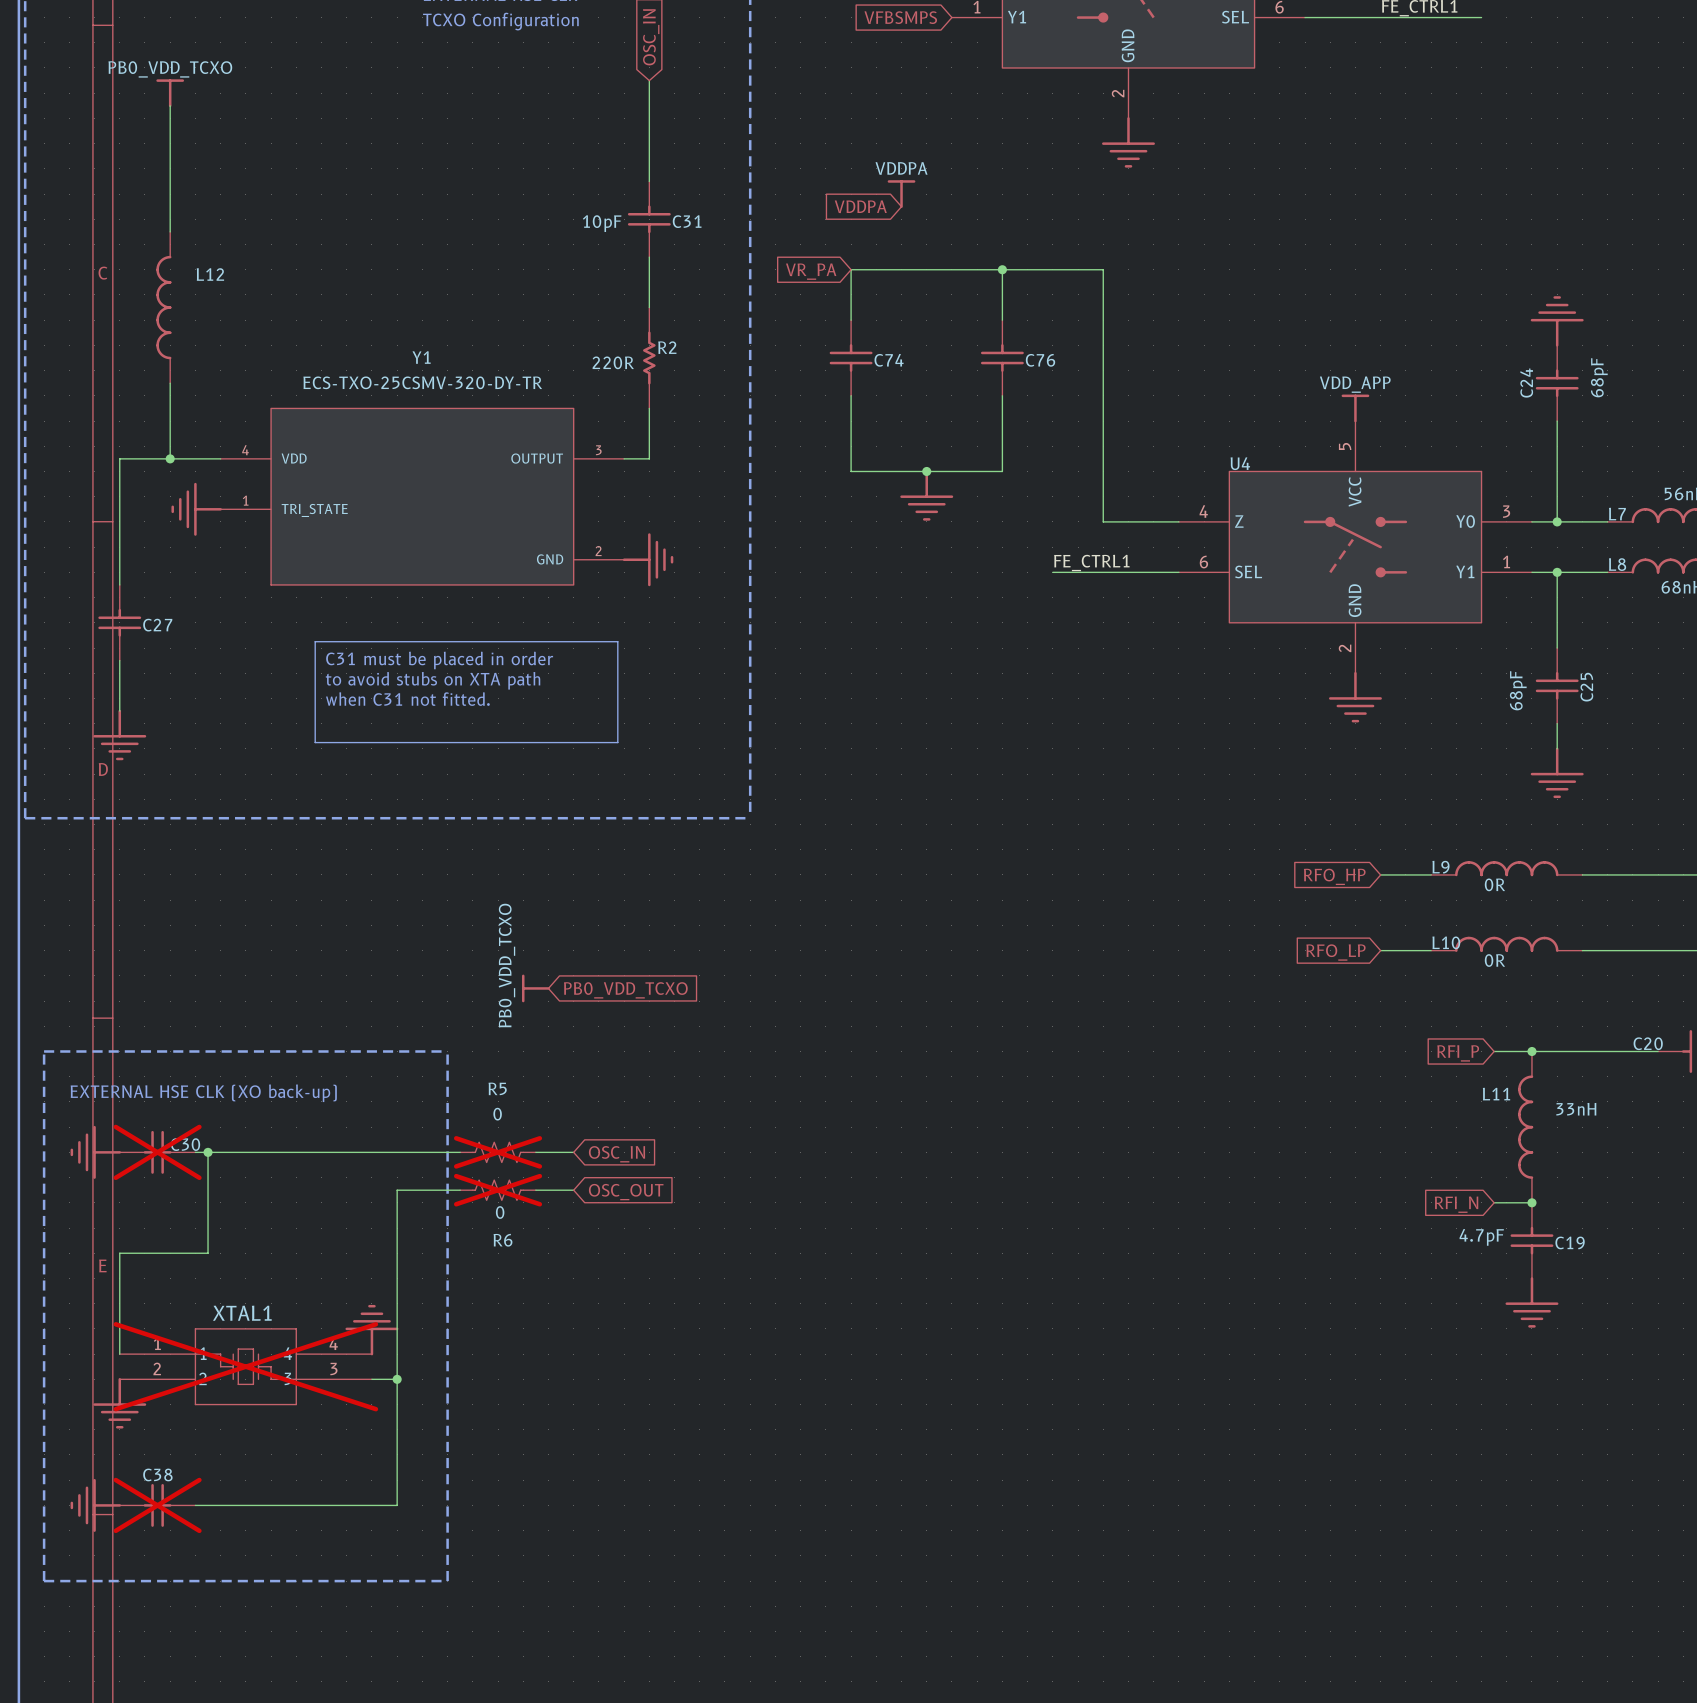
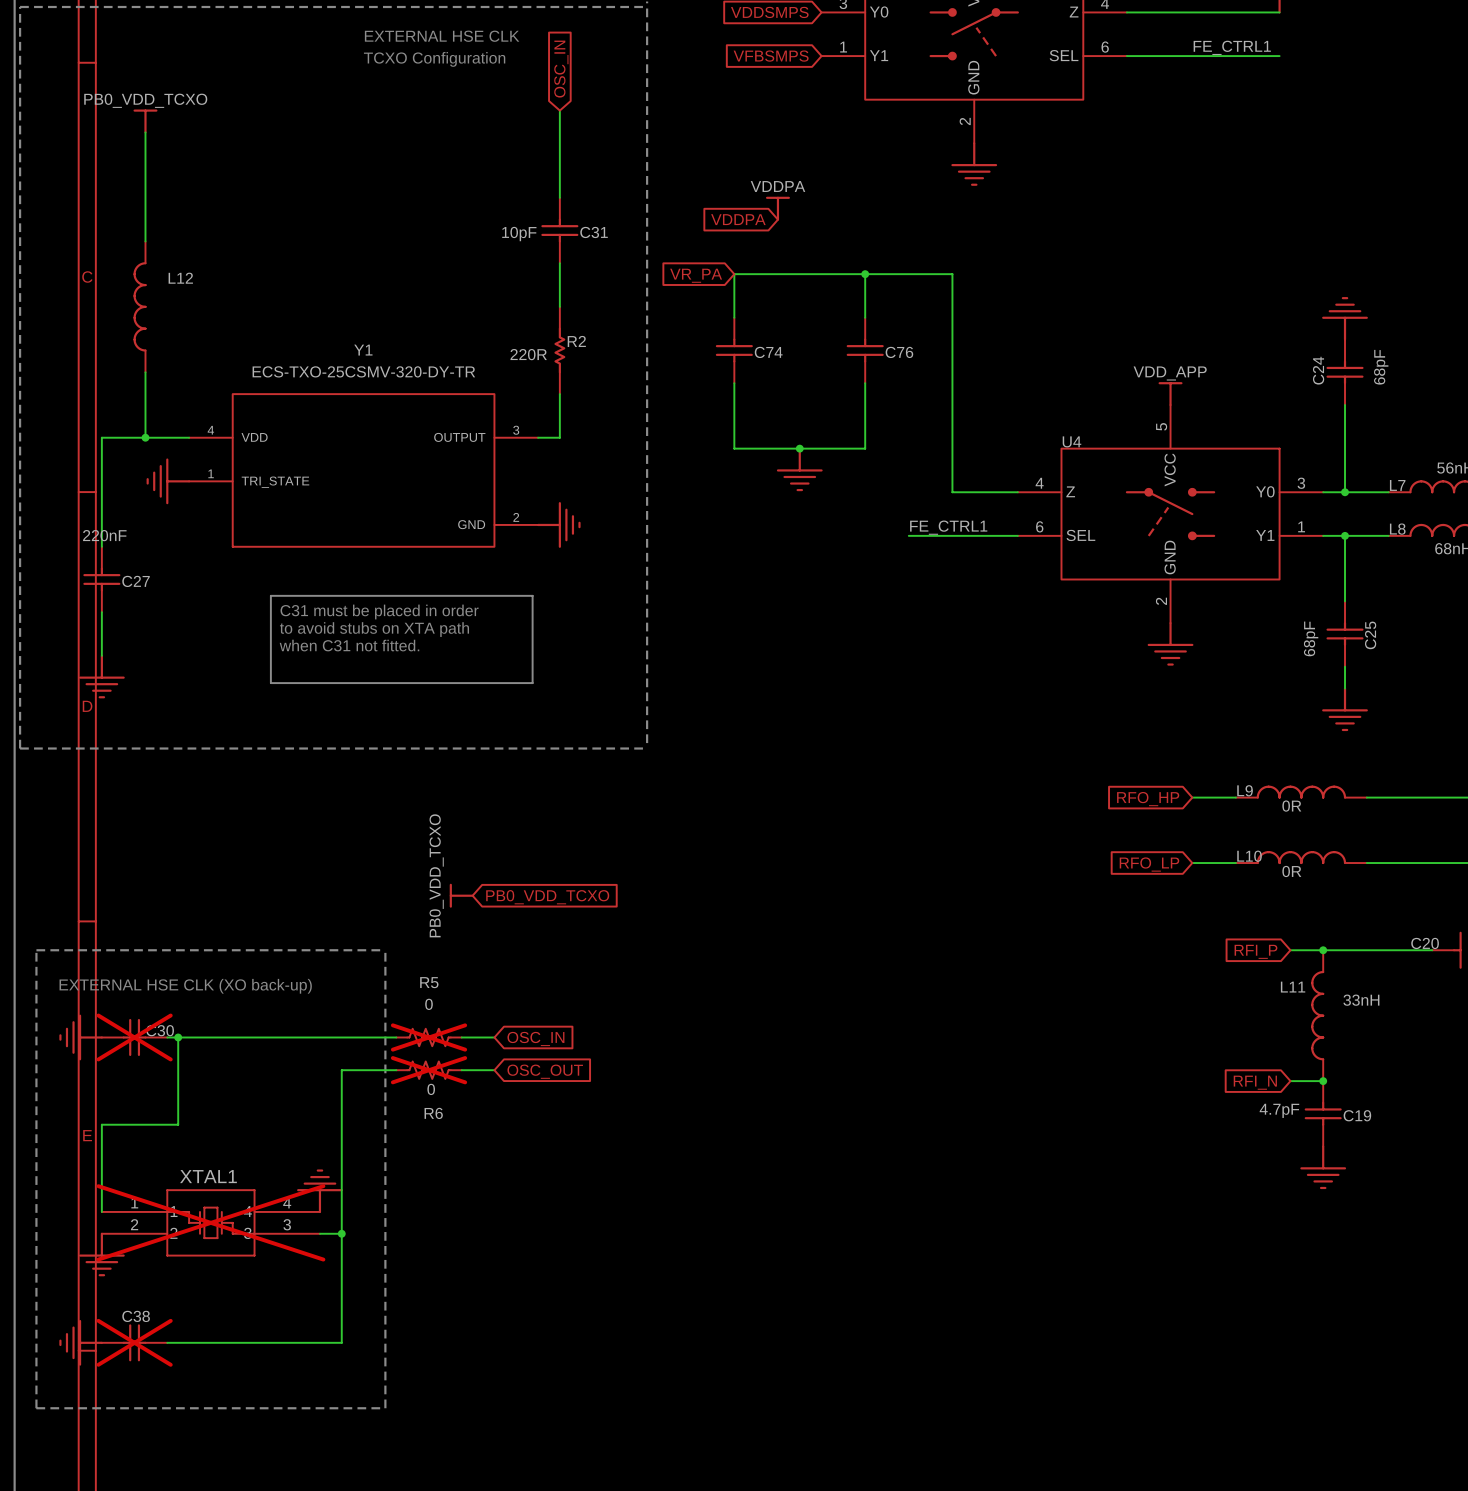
C27 value: none -> 220nF (104, 535)

